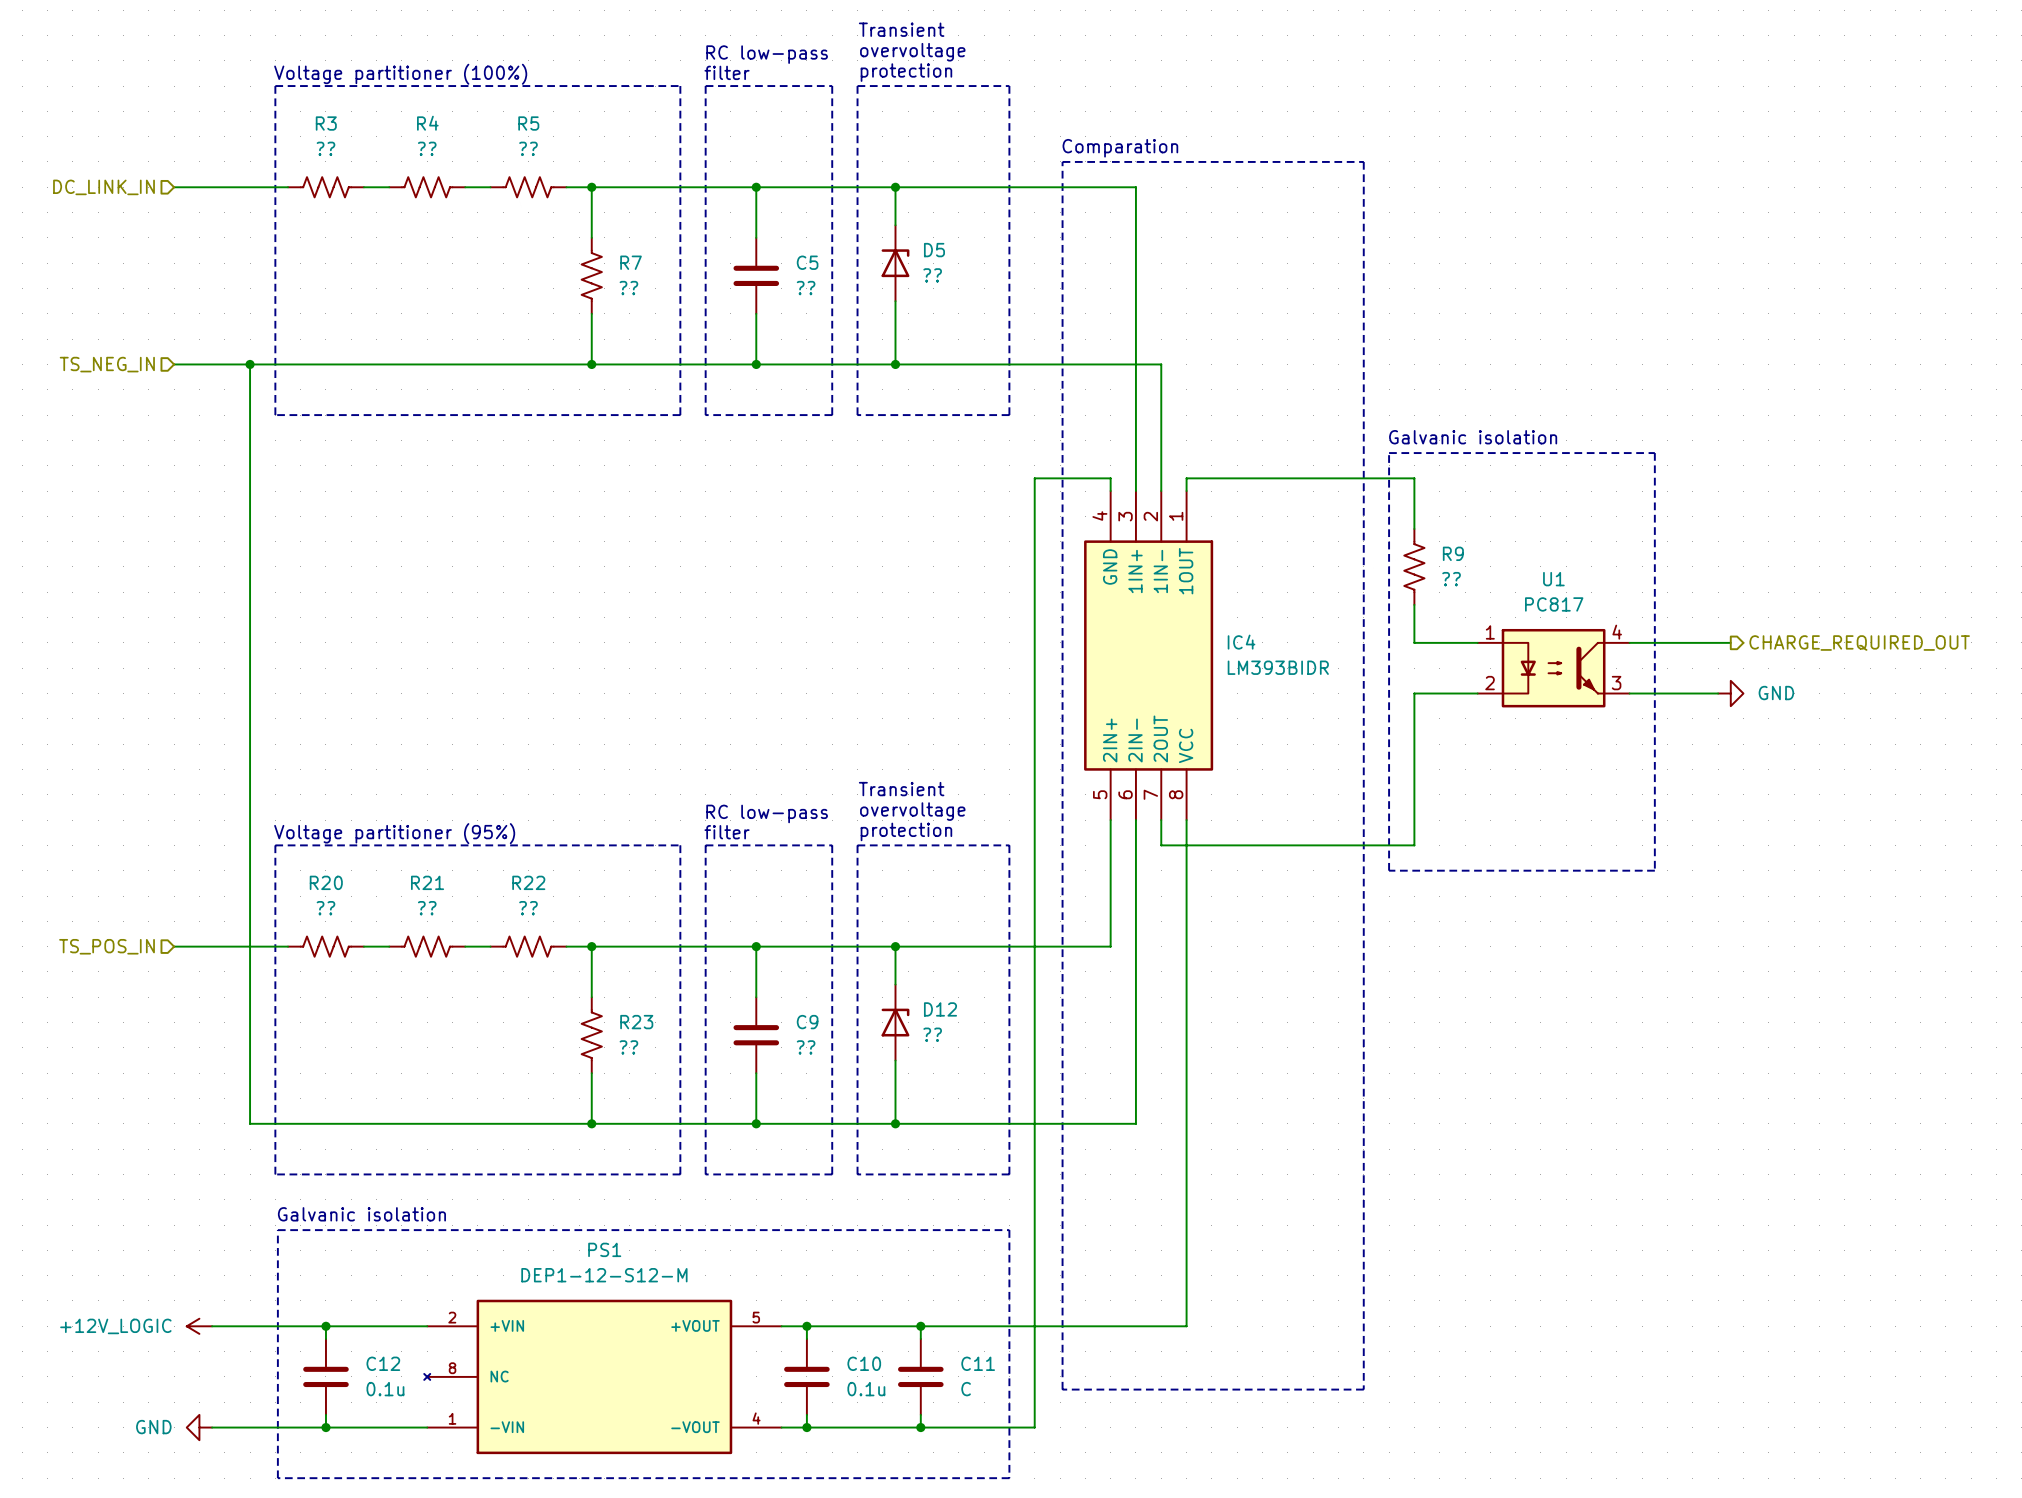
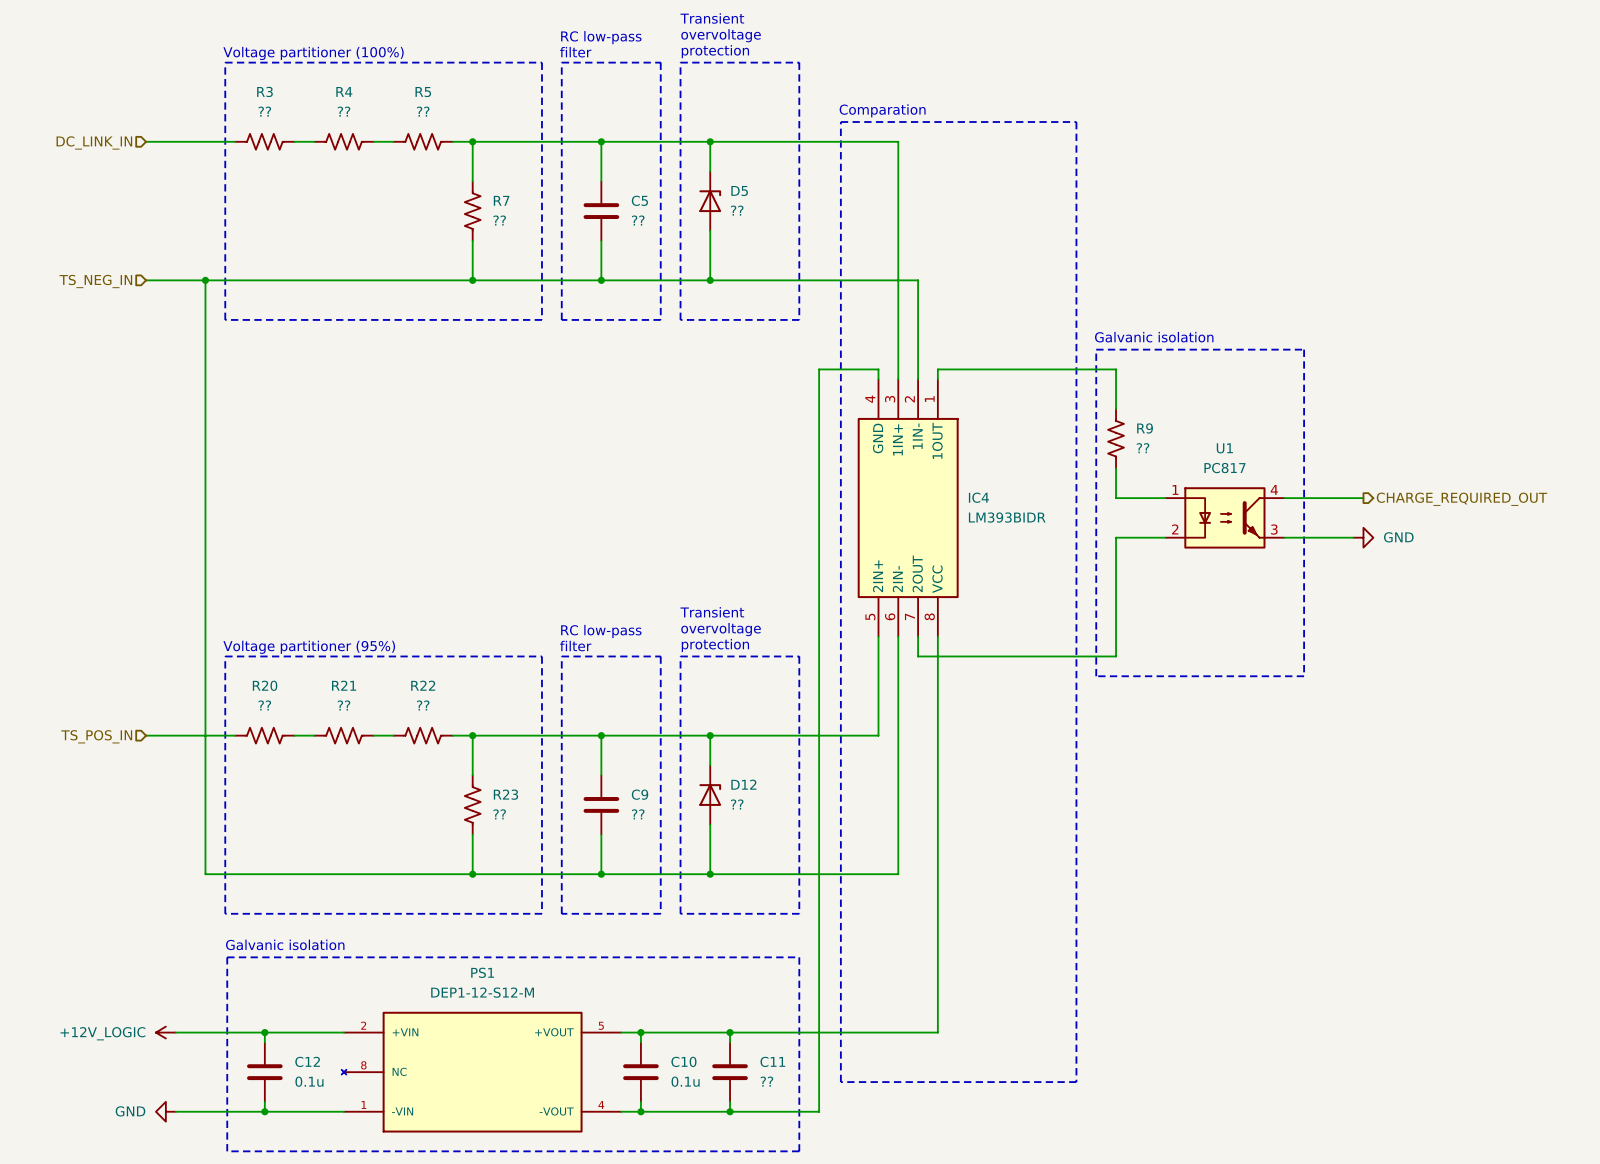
C11 value: C (966, 1389) -> ?? (766, 1081)

